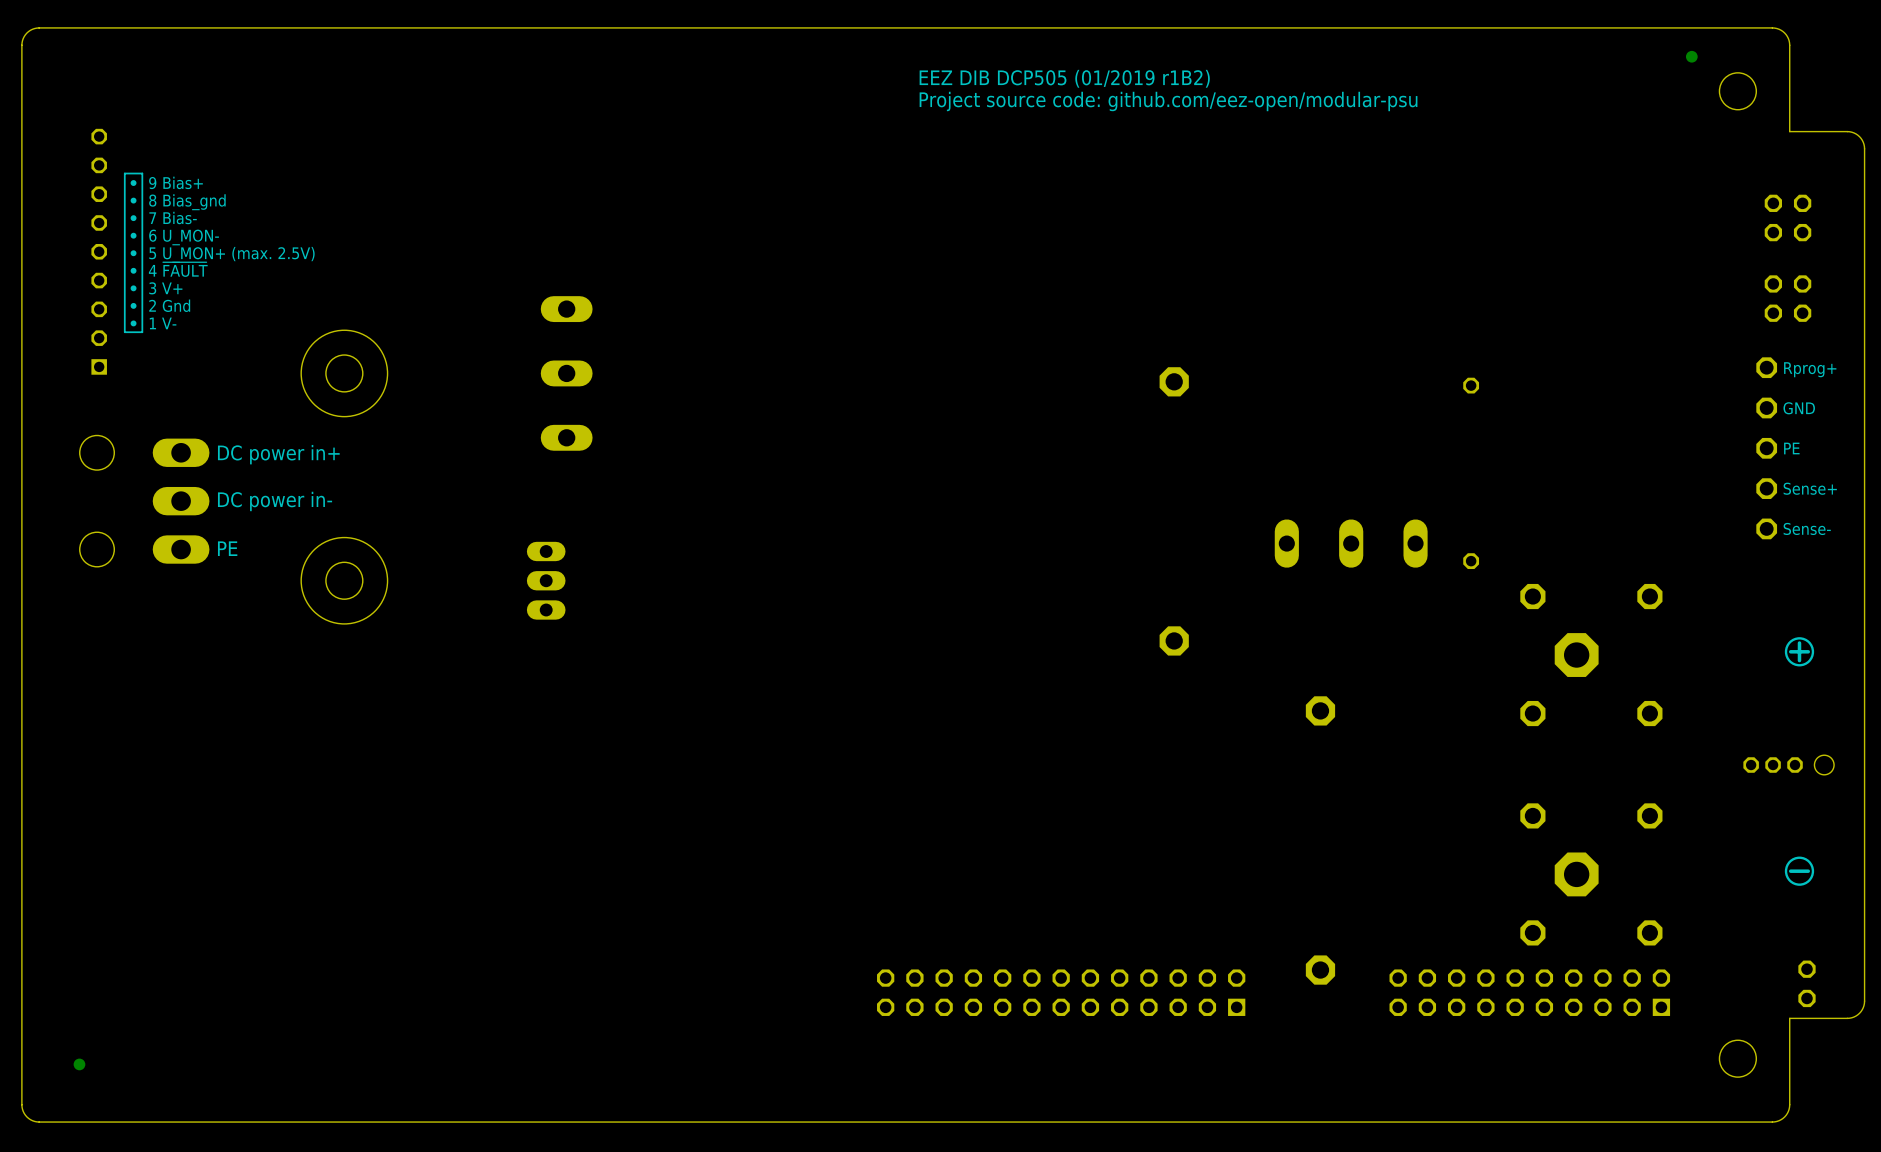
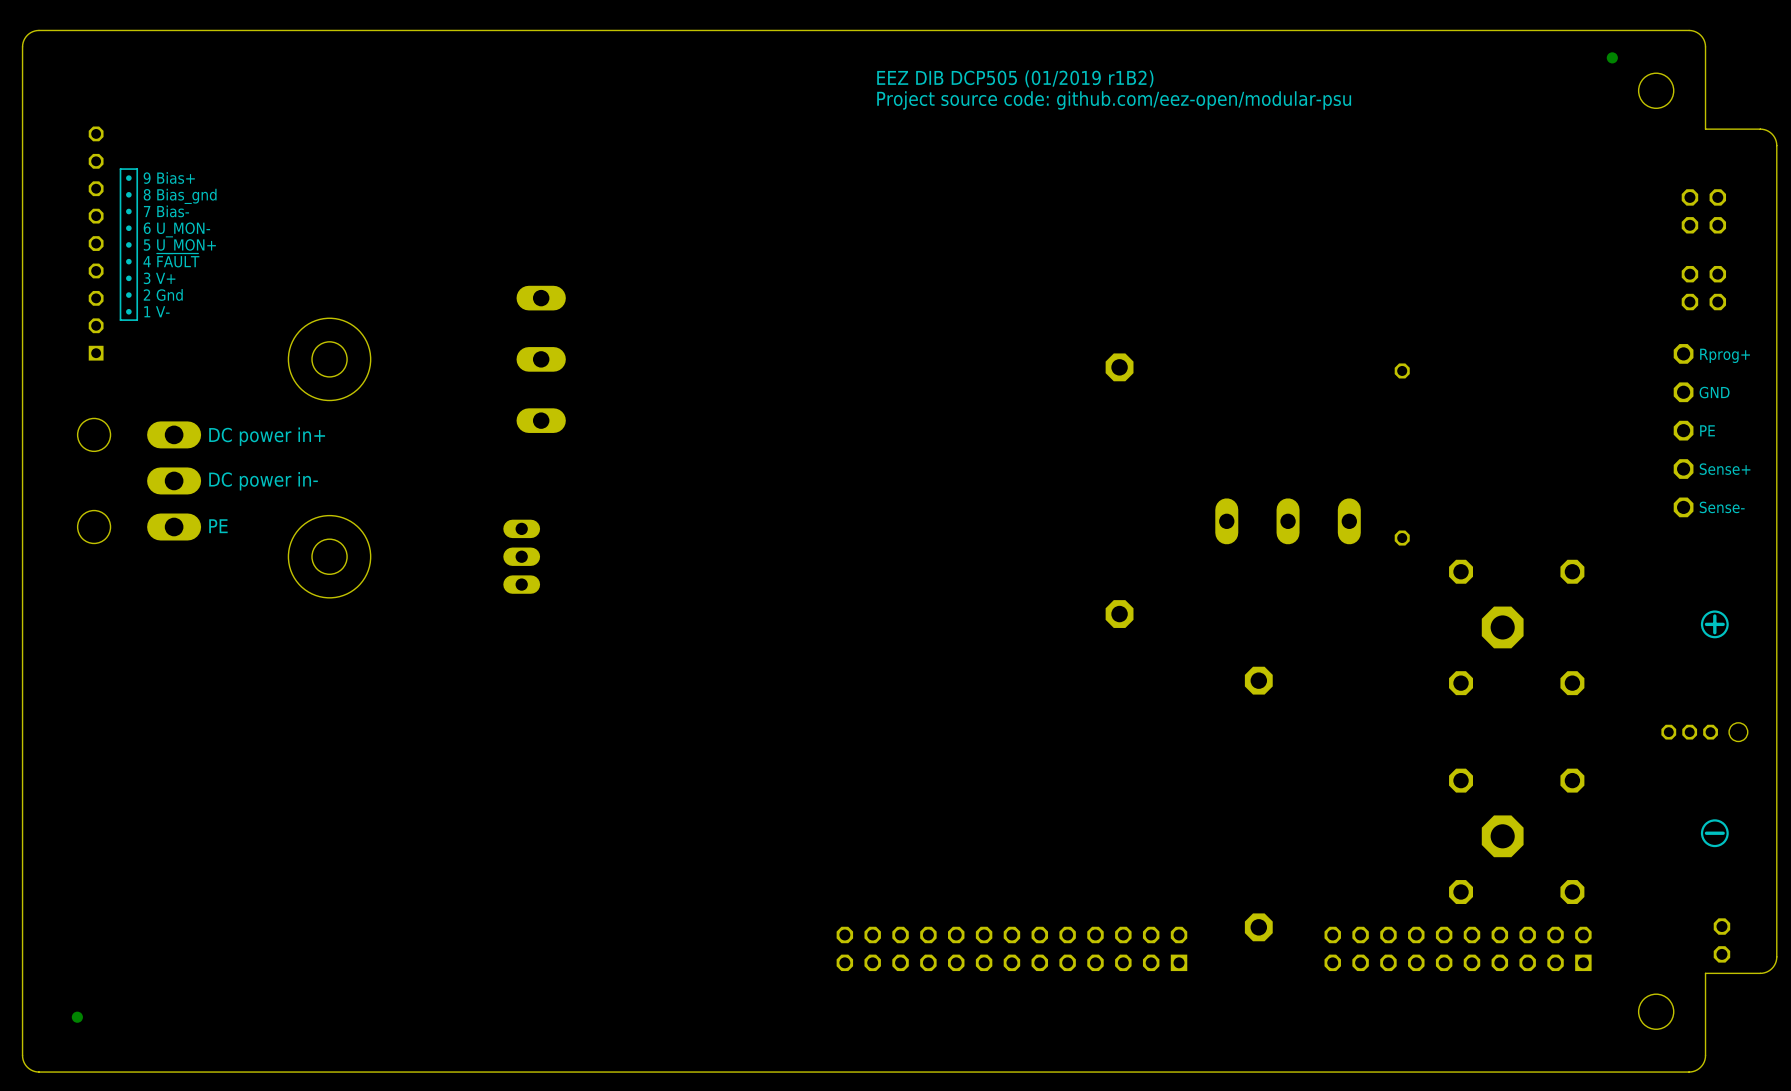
text: 5 U_MON+ (max. 2.5V) (231, 254) -> 5 U_MON+ (179, 246)

